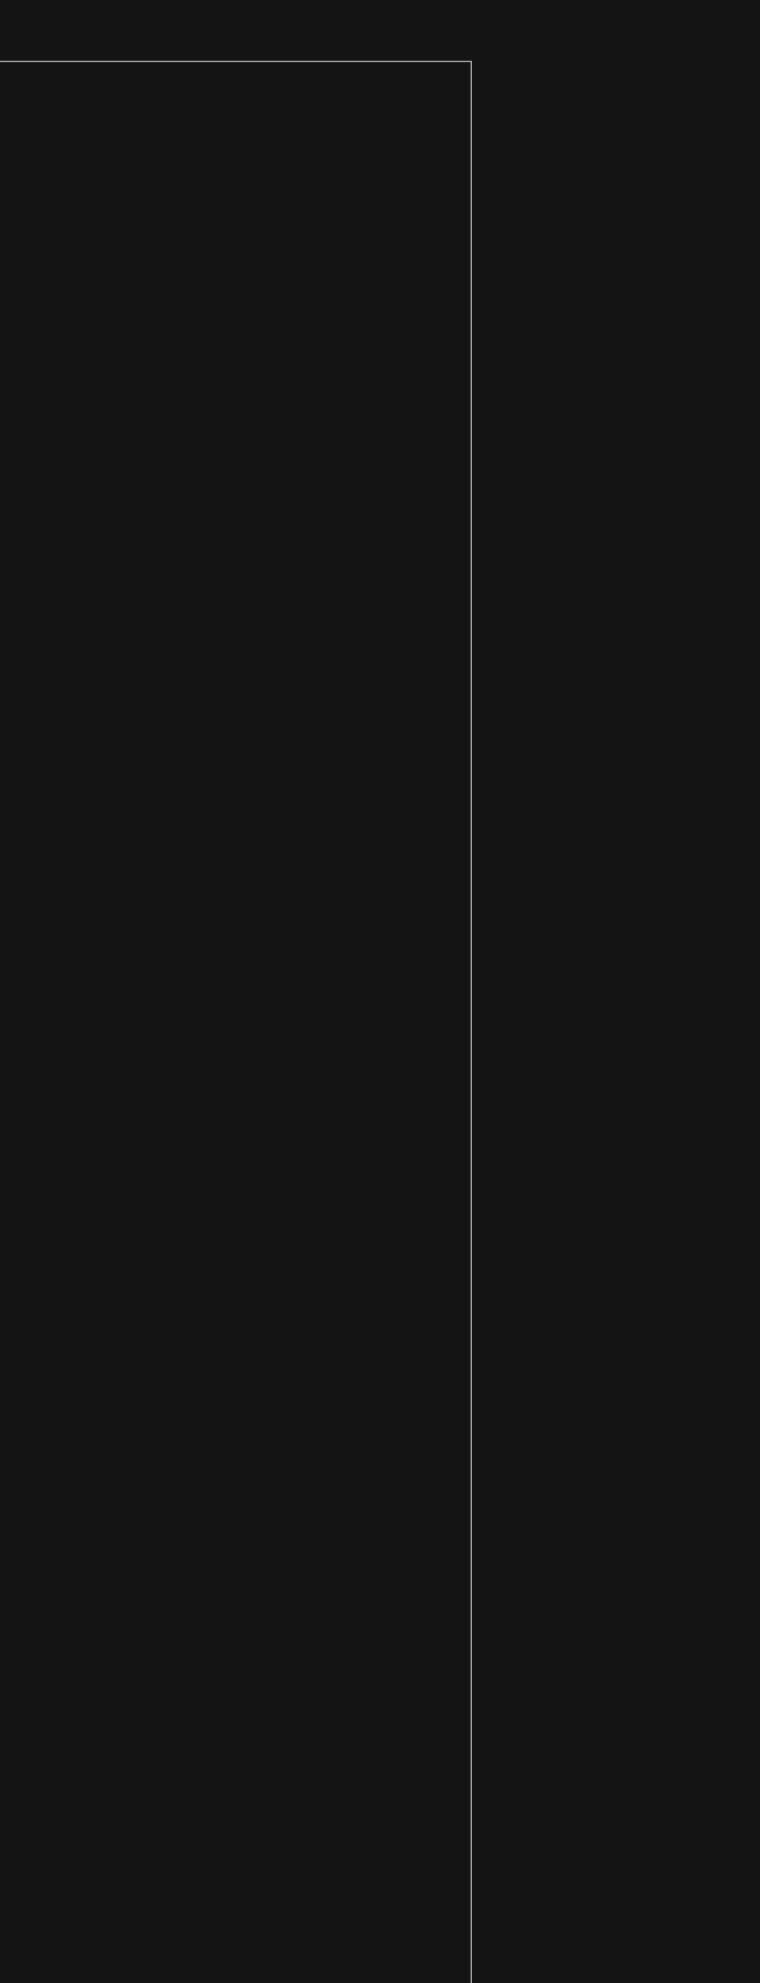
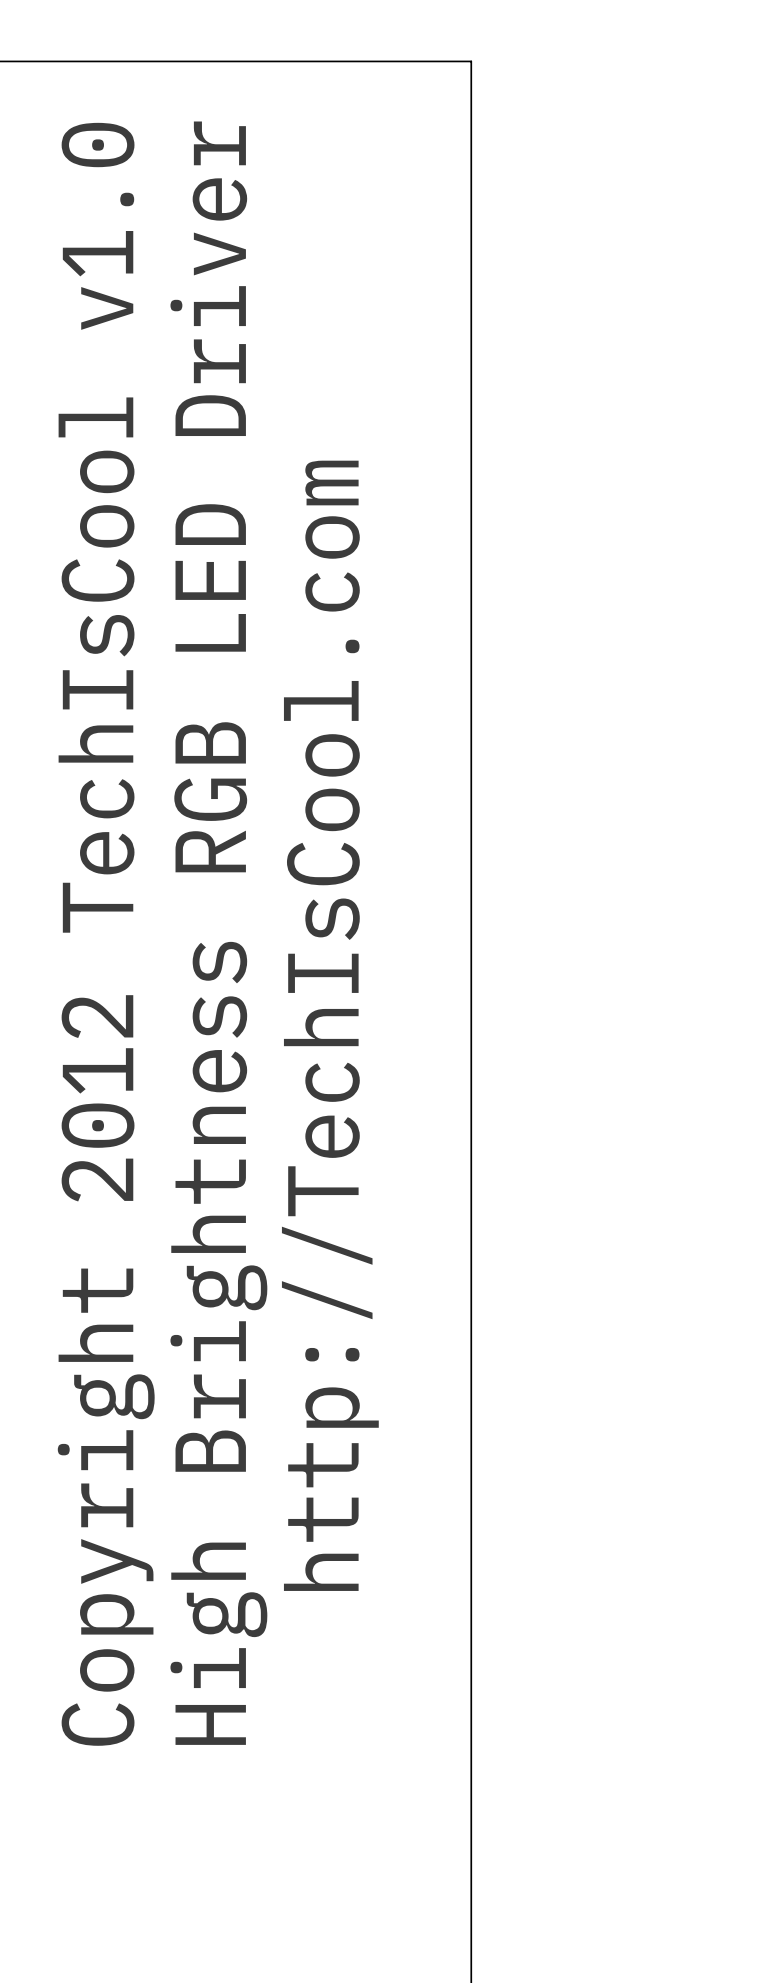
text: none -> High Brightness RGB LED Driver (218, 933)
text: none -> Copyright 2012 TechIsCool v1.0 (106, 934)
text: none -> http://TechIsCool.com (330, 1025)

